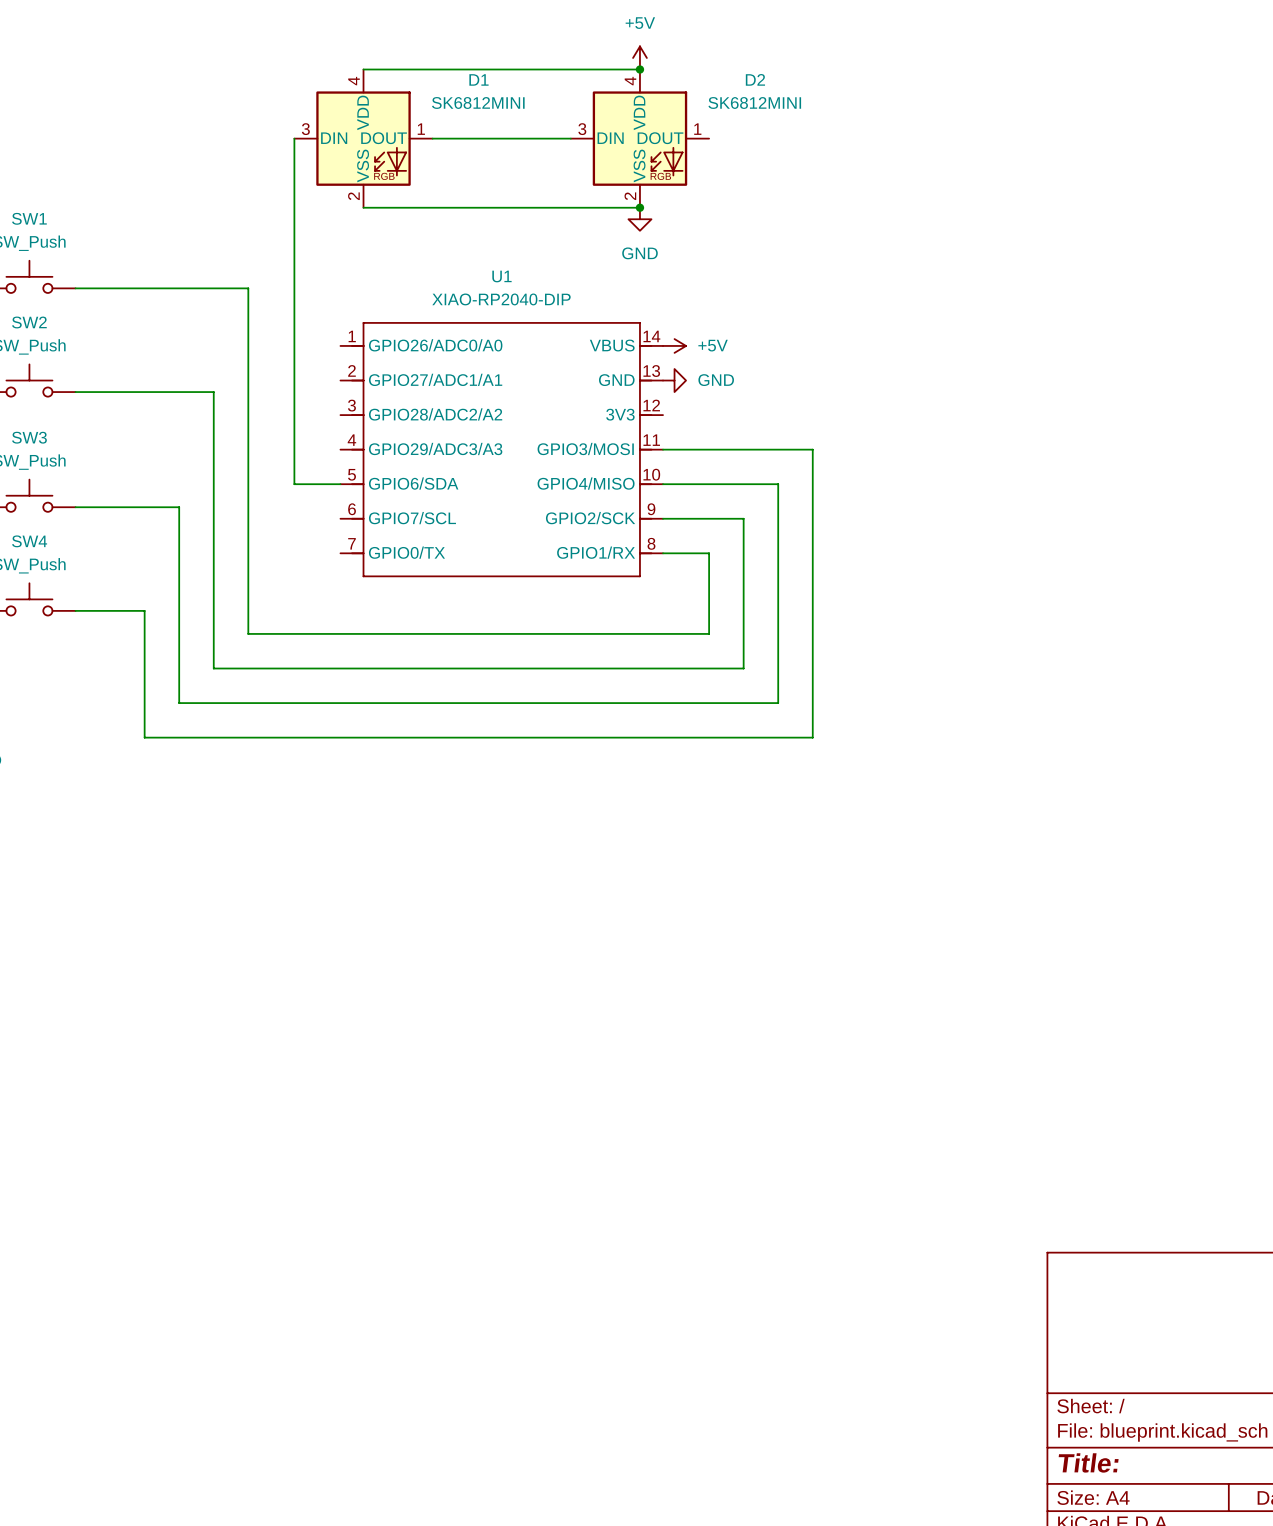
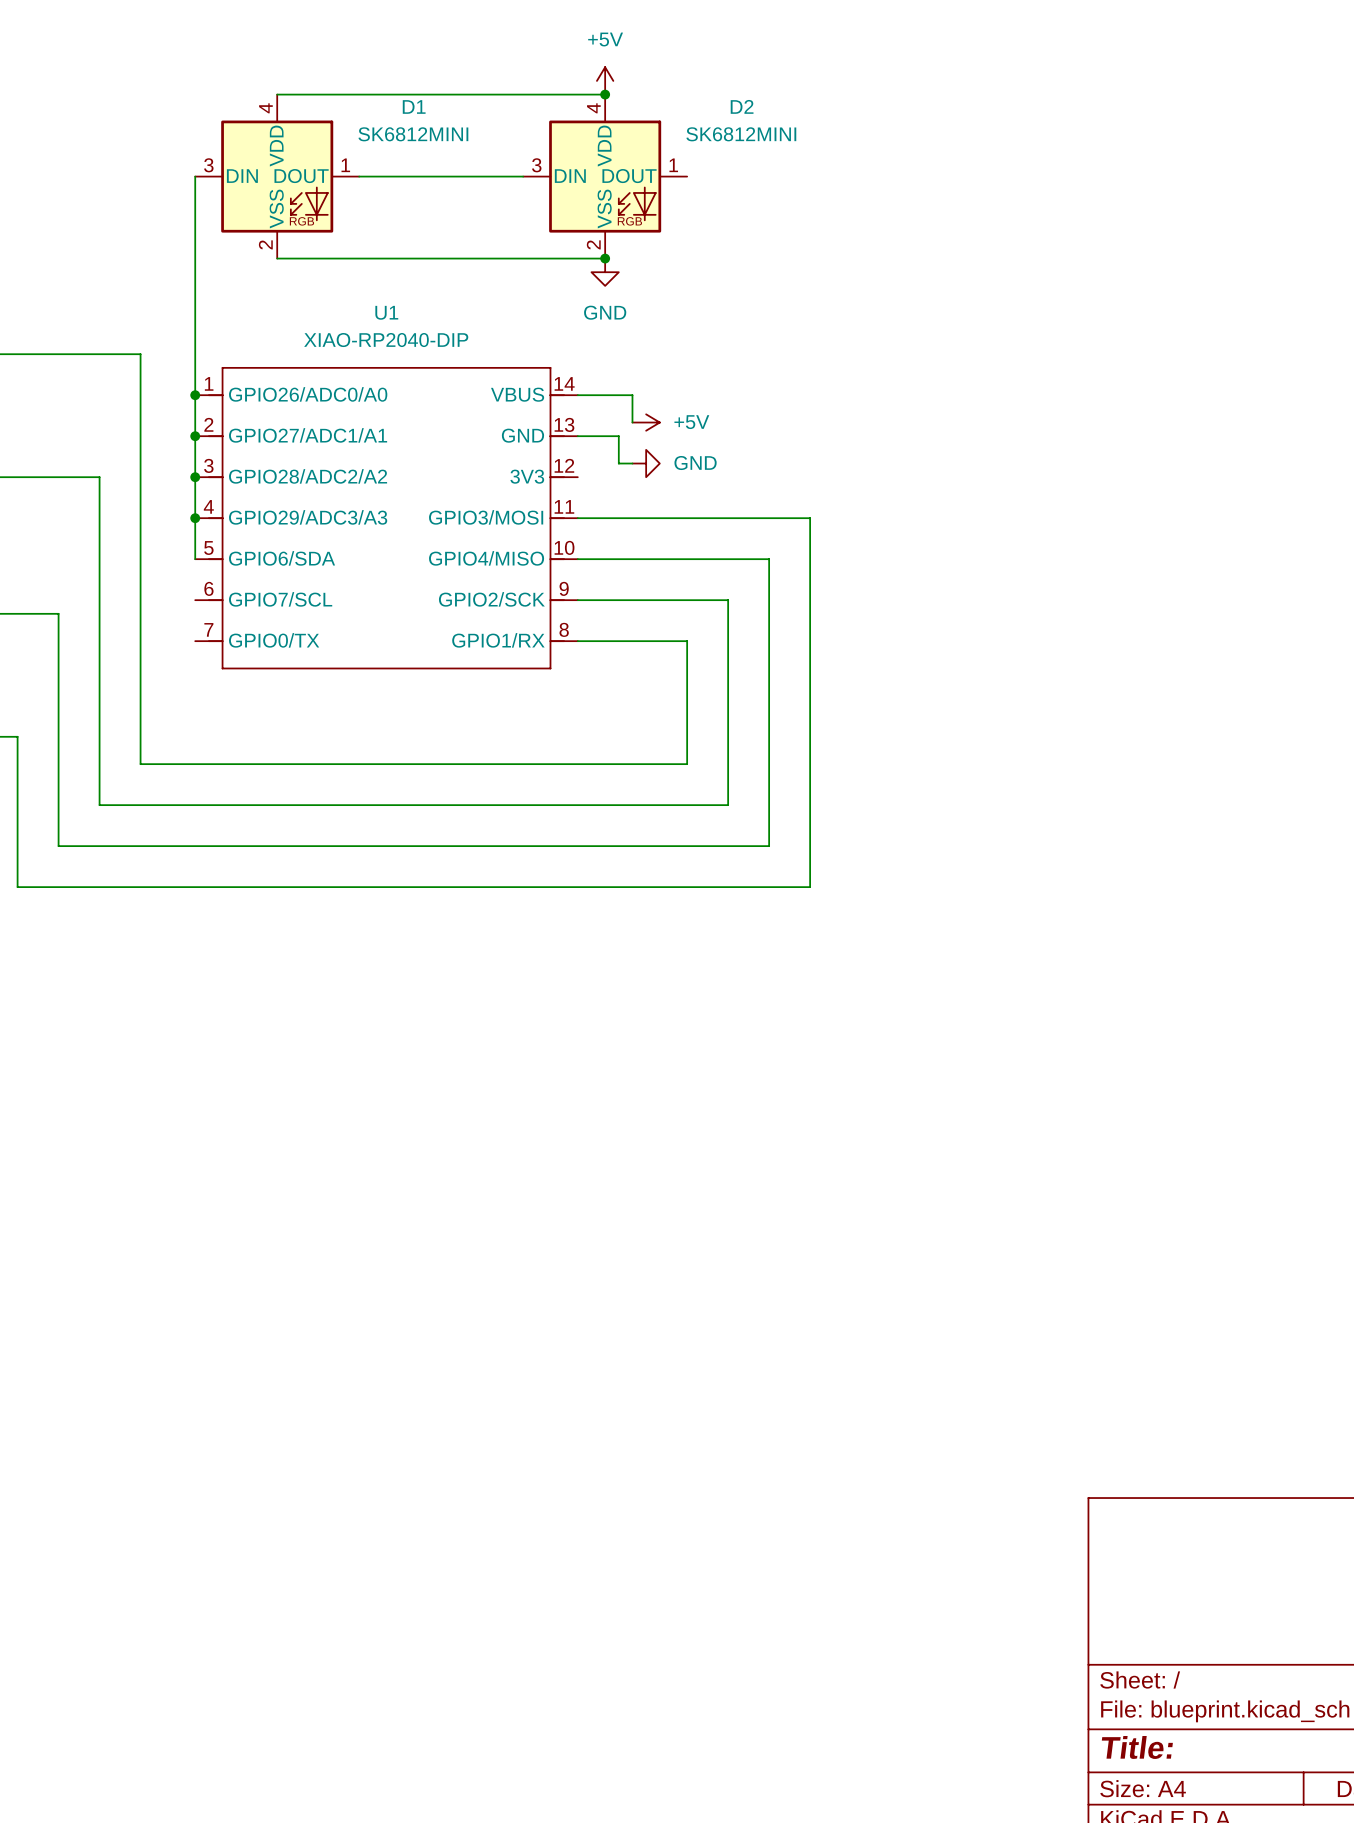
junction: none -> (195, 395)
wire: none -> (577, 395) (632, 395) (632, 422)
junction: none -> (195, 436)
wire: none -> (577, 436) (618, 436) (618, 463) (632, 463)
junction: none -> (195, 477)
junction: none -> (195, 518)
U1 position: (501, 449) -> (386, 518)
wire: (663, 449) (812, 449) -> (577, 518) (810, 518) (810, 545)
wire: (294, 461) (294, 484) (340, 484) -> none
wire: (663, 484) (778, 484) -> (577, 559) (769, 559) (769, 586)
wire: (663, 518) (743, 518) -> (577, 600) (728, 600) (728, 627)
wire: (663, 553) (709, 553) -> (577, 641) (687, 641) (687, 668)

